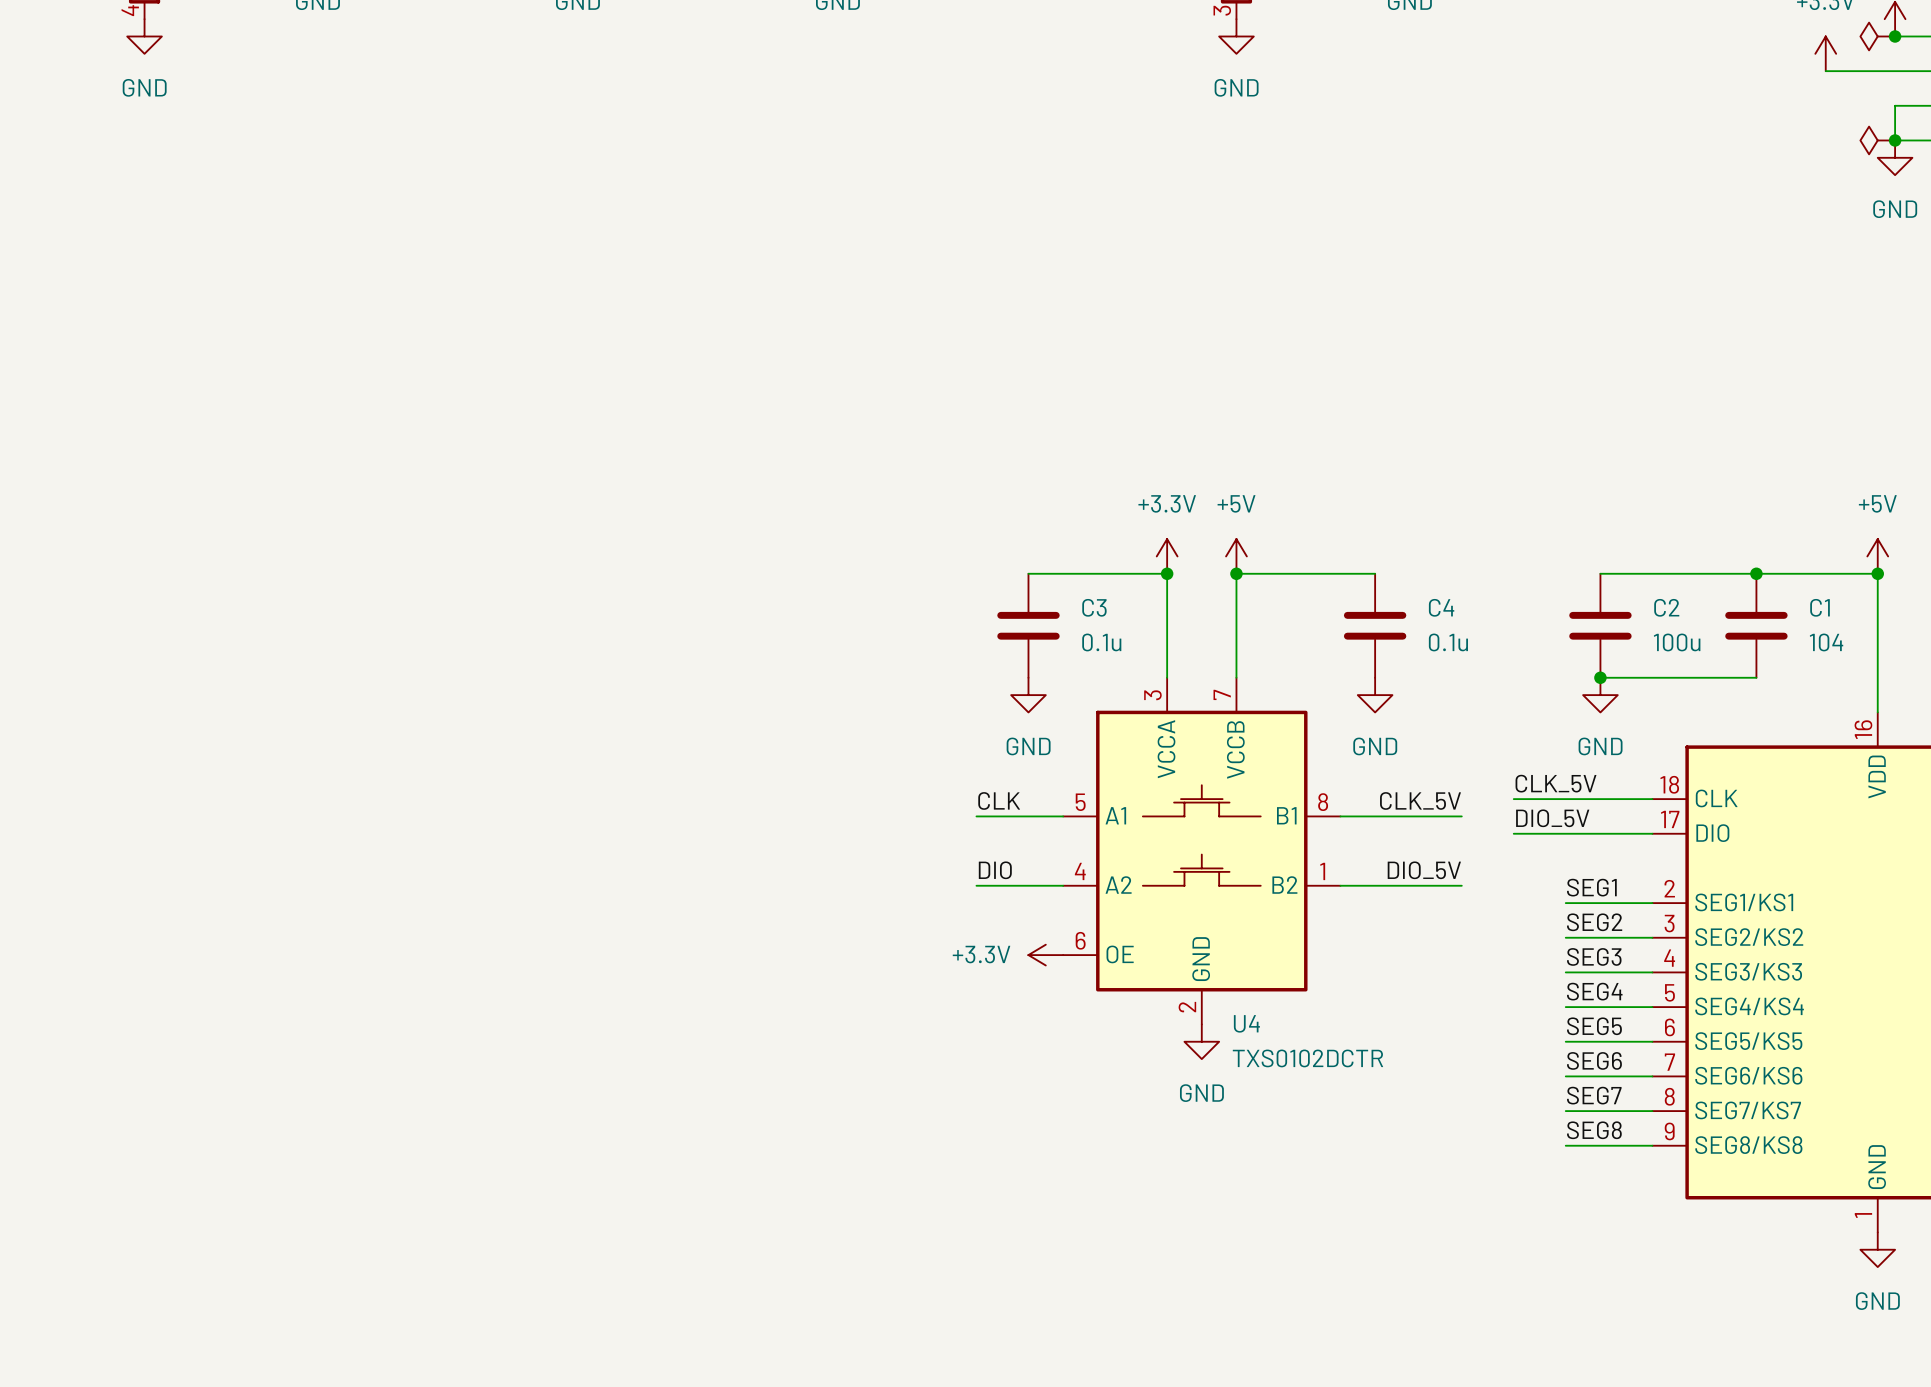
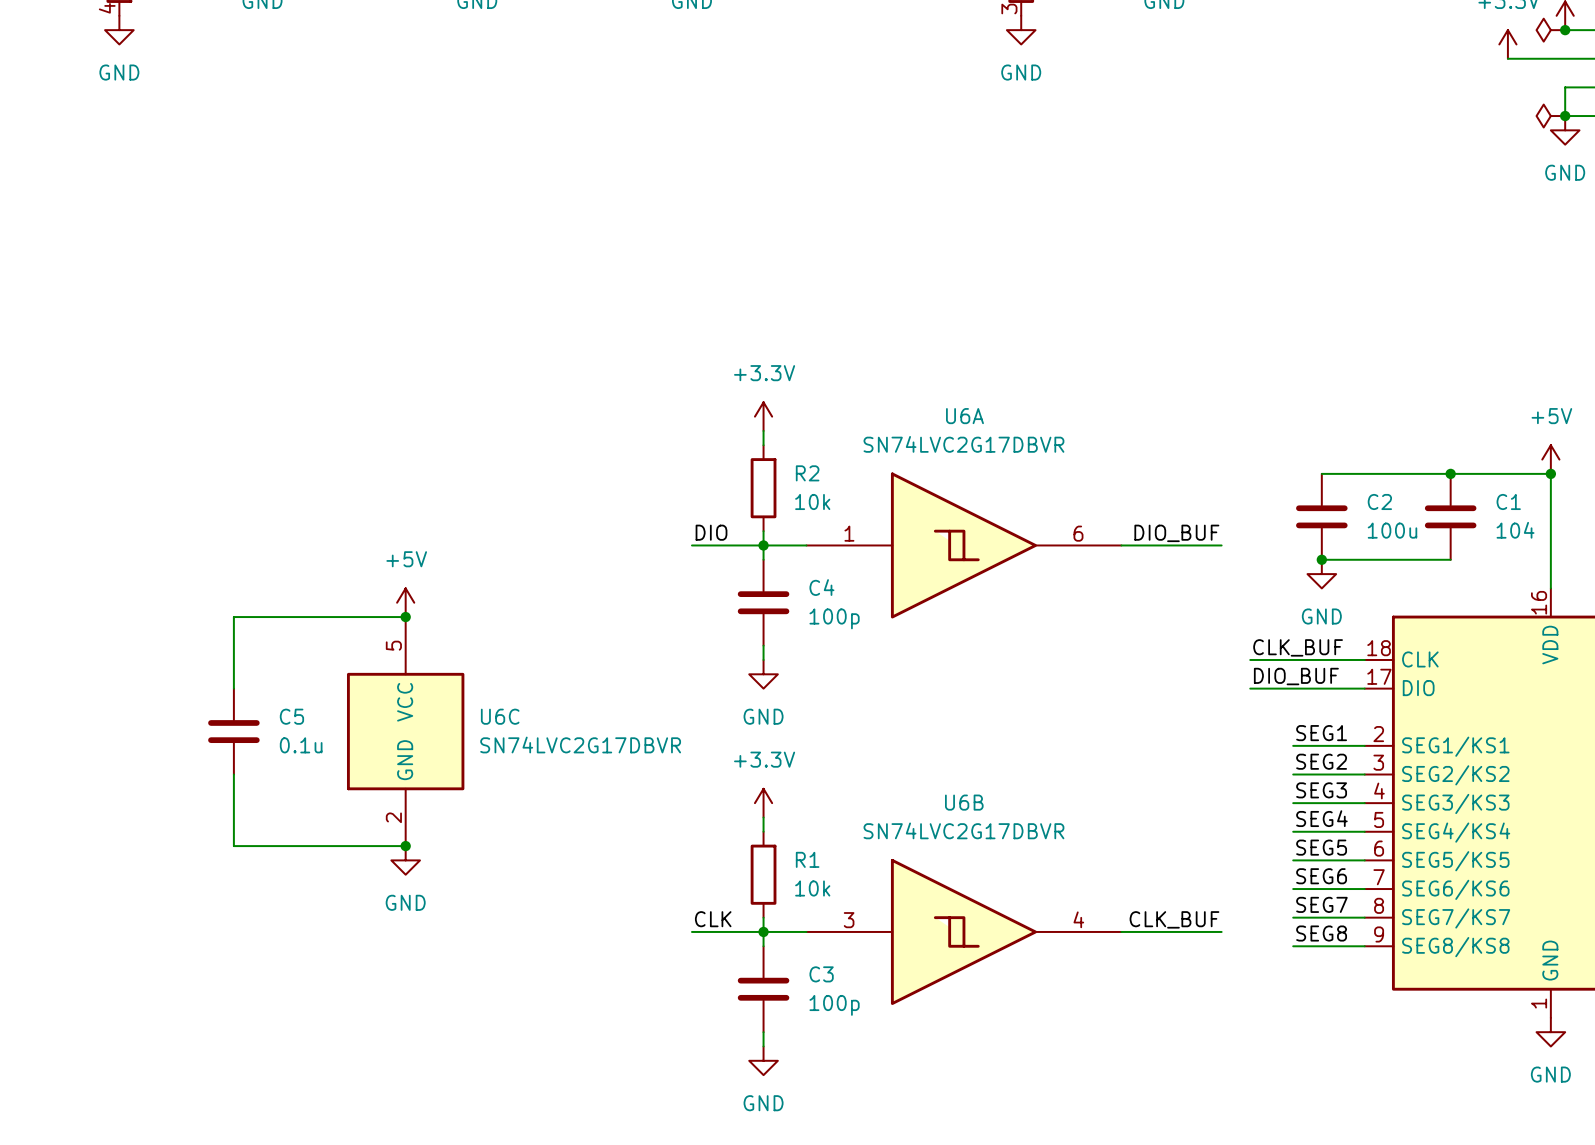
power symbol: none -> +3.3V (763, 416)
wire: none -> (763, 430) (763, 445)
power symbol: +3.3V (1167, 556) -> none
power symbol: +5V (1236, 556) -> none
wire: (1028, 573) (1167, 573) (1167, 677) -> none
junction: (1167, 573) -> none
junction: (1236, 573) -> none
wire: (1375, 573) (1236, 573) (1236, 677) -> none
R2: none -> 10k (763, 488)
C3 position: (1028, 625) -> (763, 989)
C4 position: (1375, 625) -> (763, 602)
C3 value: 0.1u (1101, 642) -> 100p (834, 1005)
C4 value: 0.1u (1448, 642) -> 100p (834, 618)
wire: none -> (763, 531) (763, 559)
label: none -> DIO_BUF (1176, 533)
wire: none -> (691, 545) (806, 545)
junction: none -> (763, 545)
U6A: none -> SN74LVC2G17DBVR (963, 545)
power symbol position: GND (1028, 695) -> GND (763, 674)
power symbol: GND (1375, 695) -> none
power symbol: none -> +5V (405, 602)
wire: none -> (405, 617) (233, 617) (233, 688)
junction: none -> (405, 617)
wire: none -> (763, 645) (763, 659)
label: CLK_5V (1556, 783) -> CLK_BUF (1298, 647)
label: CLK (999, 800) -> none
label: CLK_5V (1420, 800) -> none
wire: (976, 816) (1063, 816) -> none
wire: (1340, 816) (1461, 816) -> (1121, 545) (1221, 545)
label: DIO_5V (1552, 818) -> DIO_BUF (1296, 676)
U4: TXS0102DCTR (1201, 851) -> none
label position: DIO (995, 870) -> DIO (711, 532)
label: DIO_5V (1424, 870) -> none
C5: none -> 0.1u (233, 731)
U6C: none -> SN74LVC2G17DBVR (405, 731)
wire: (976, 885) (1063, 885) -> none
wire: (1340, 885) (1461, 885) -> (1121, 931) (1221, 931)
wire: none -> (233, 774) (233, 846) (405, 846)
power symbol text position: +3.3V (981, 954) -> +3.3V (764, 759)
power symbol rotation: 0° (1045, 955) -> 90° clockwise (763, 803)
power symbol position: +3.3V (1045, 955) -> +3.3V (763, 803)
wire: none -> (763, 817) (763, 831)
junction: none -> (405, 846)
power symbol: none -> GND (405, 860)
power symbol: GND (1201, 1041) -> none
R1: none -> 10k (763, 874)
wire: none -> (763, 917) (763, 946)
label: none -> CLK (713, 919)
label: none -> CLK_BUF (1174, 919)
wire: none -> (691, 931) (806, 931)
junction: none -> (763, 931)
U6B: none -> SN74LVC2G17DBVR (963, 931)
wire: none -> (763, 1032) (763, 1046)
power symbol: none -> GND (763, 1060)

